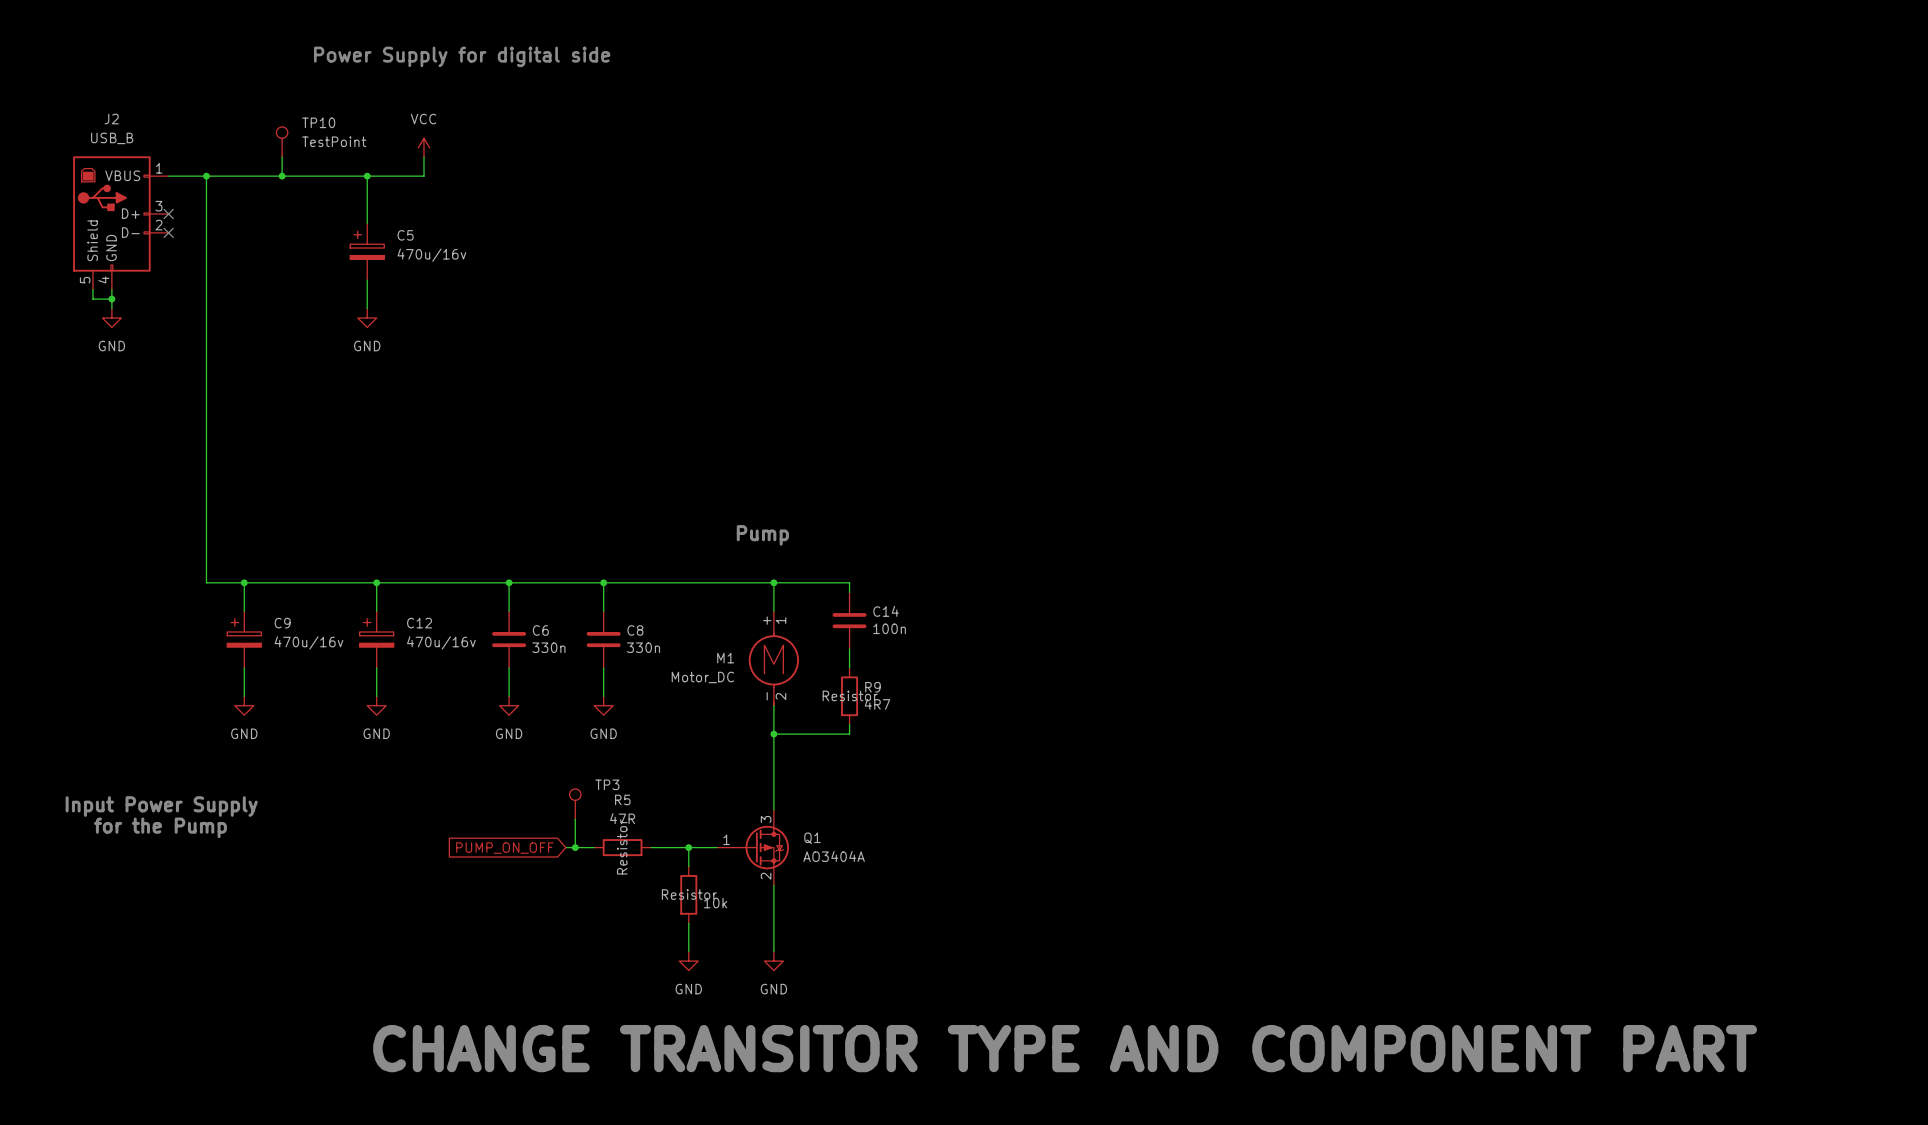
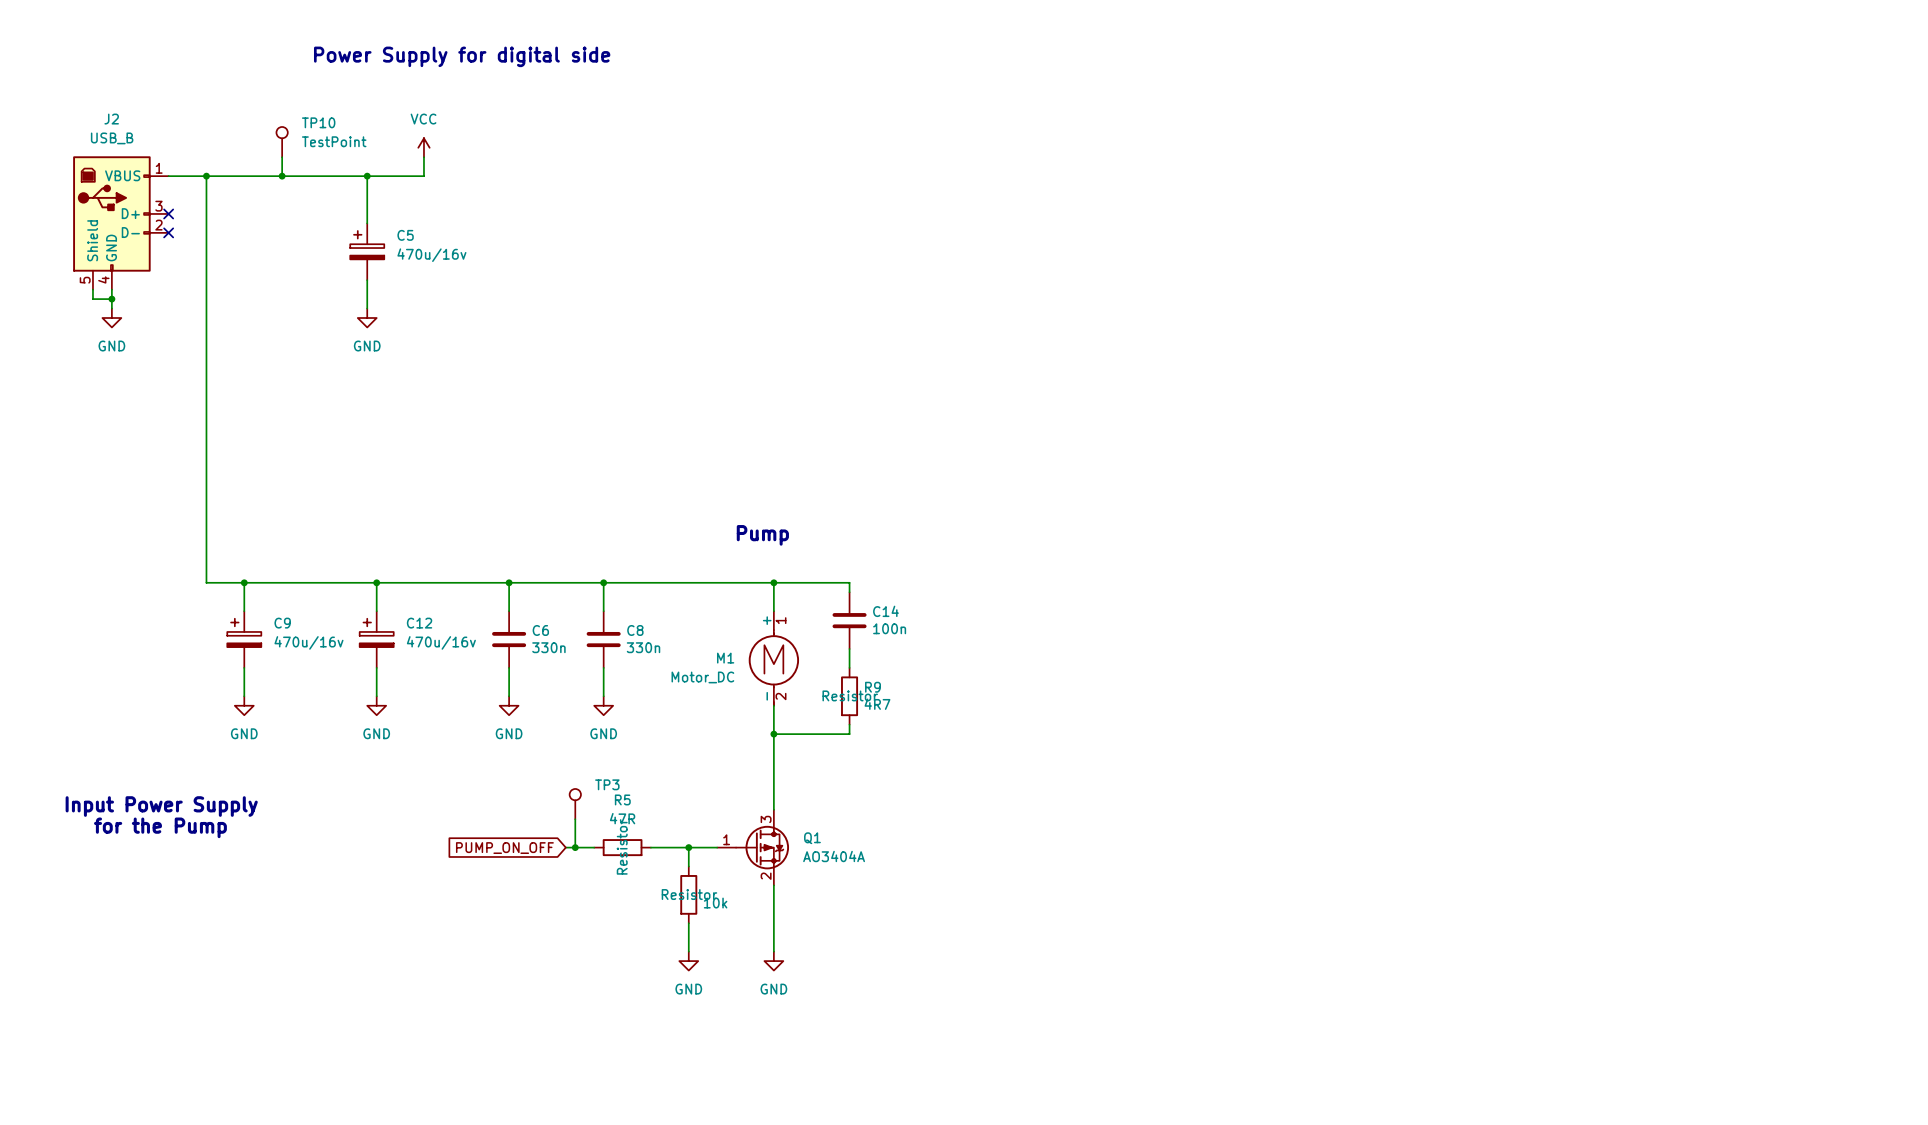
text: CHANGE TRANSITOR TYPE AND COMPONENT PART (1065, 1048) -> none

